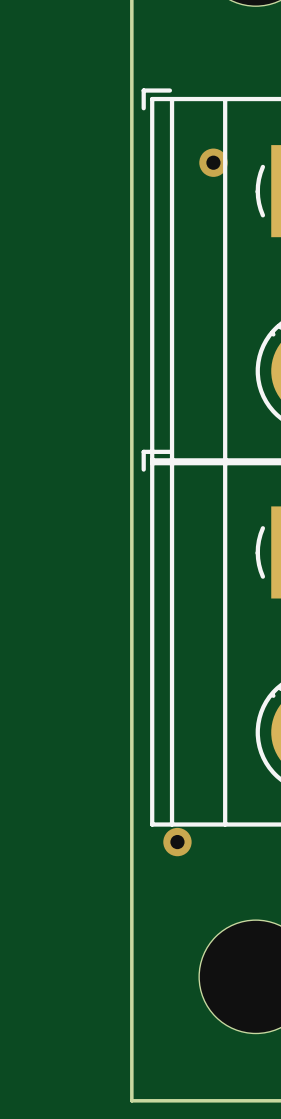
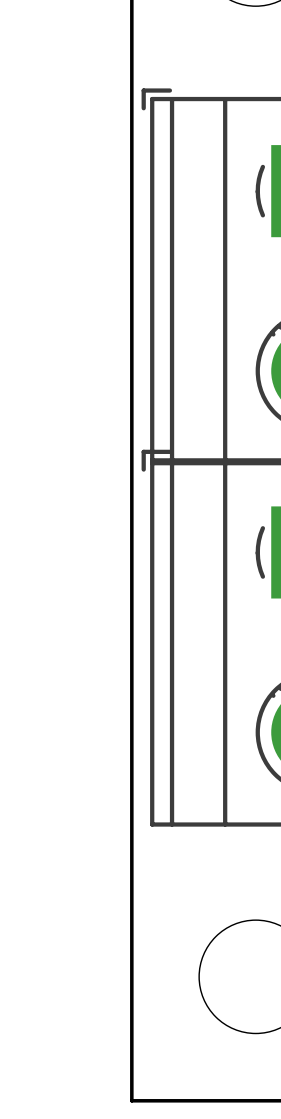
via: (213, 162) -> none
via: (177, 842) -> none

